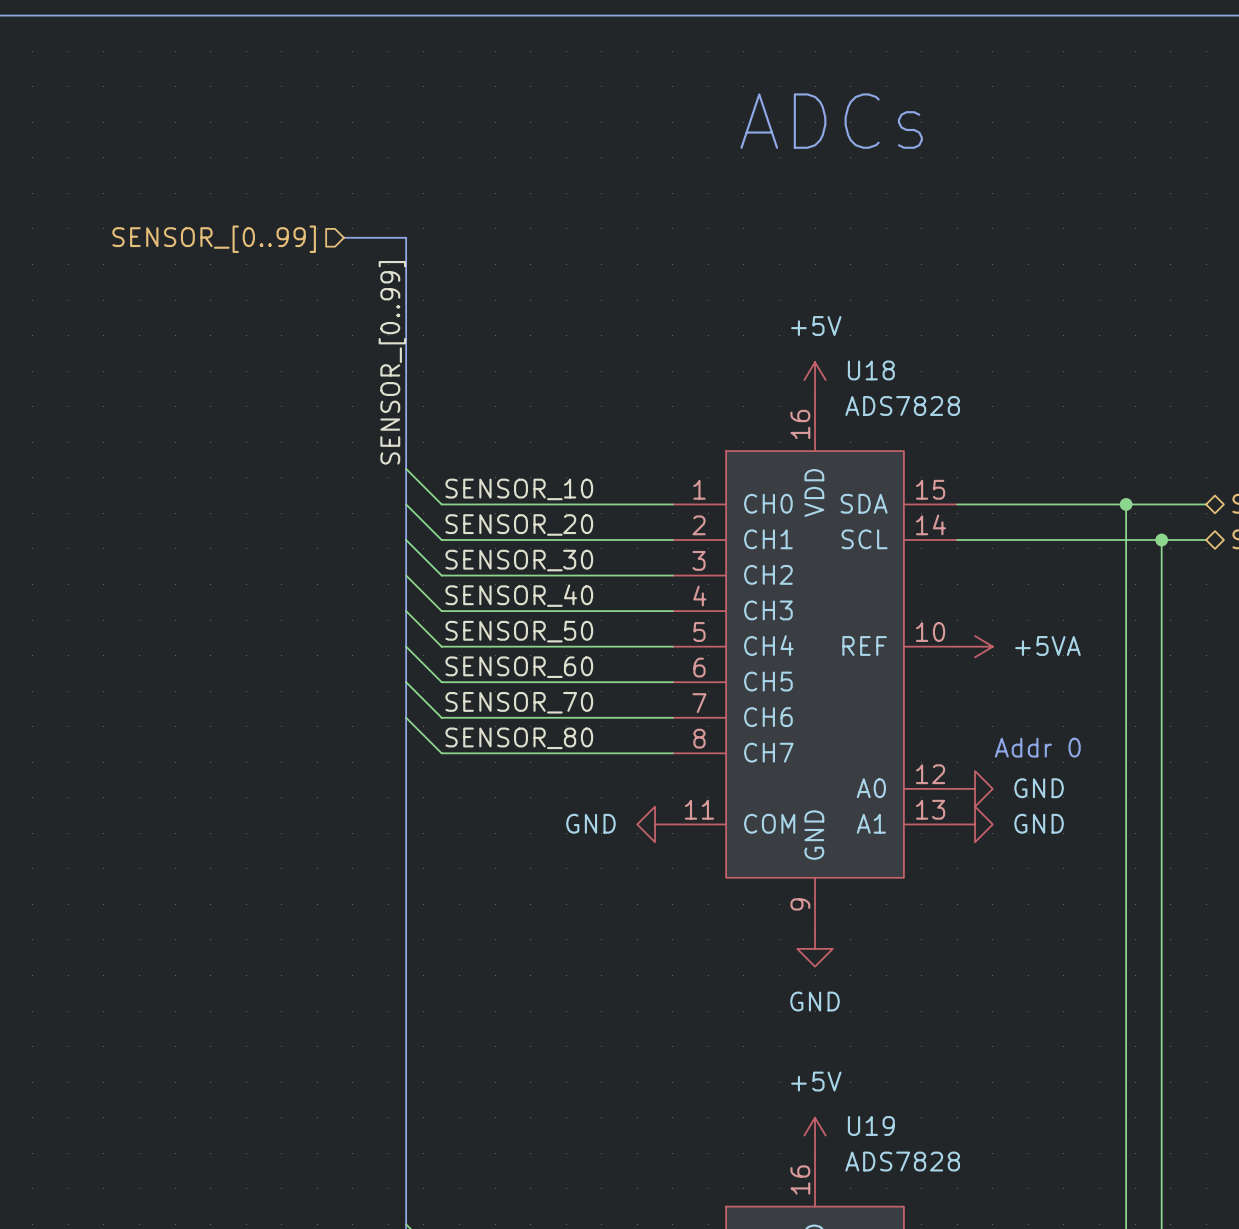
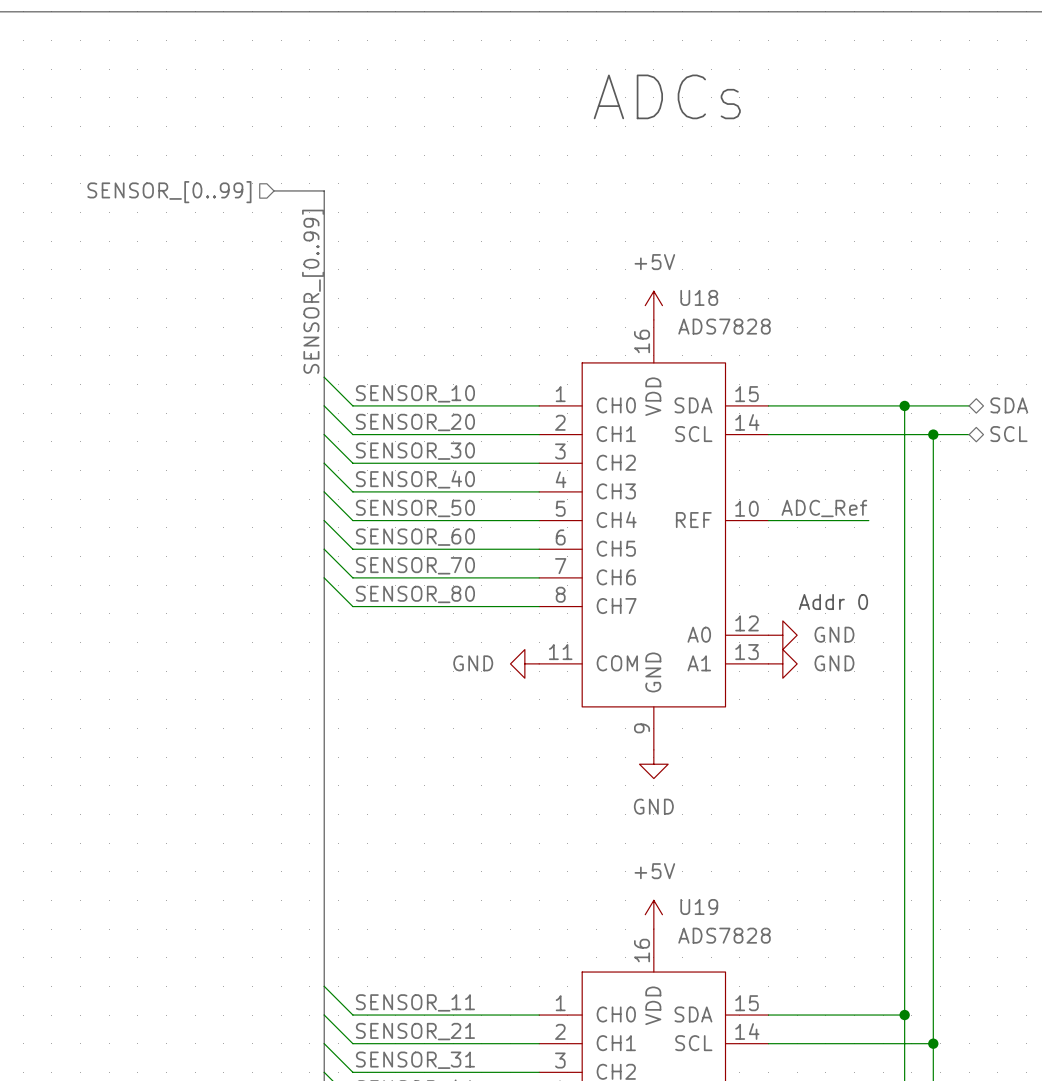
label: none -> ADC_Ref (824, 508)
wire: none -> (768, 520) (868, 520)
power symbol: +5VA (975, 646) -> none

